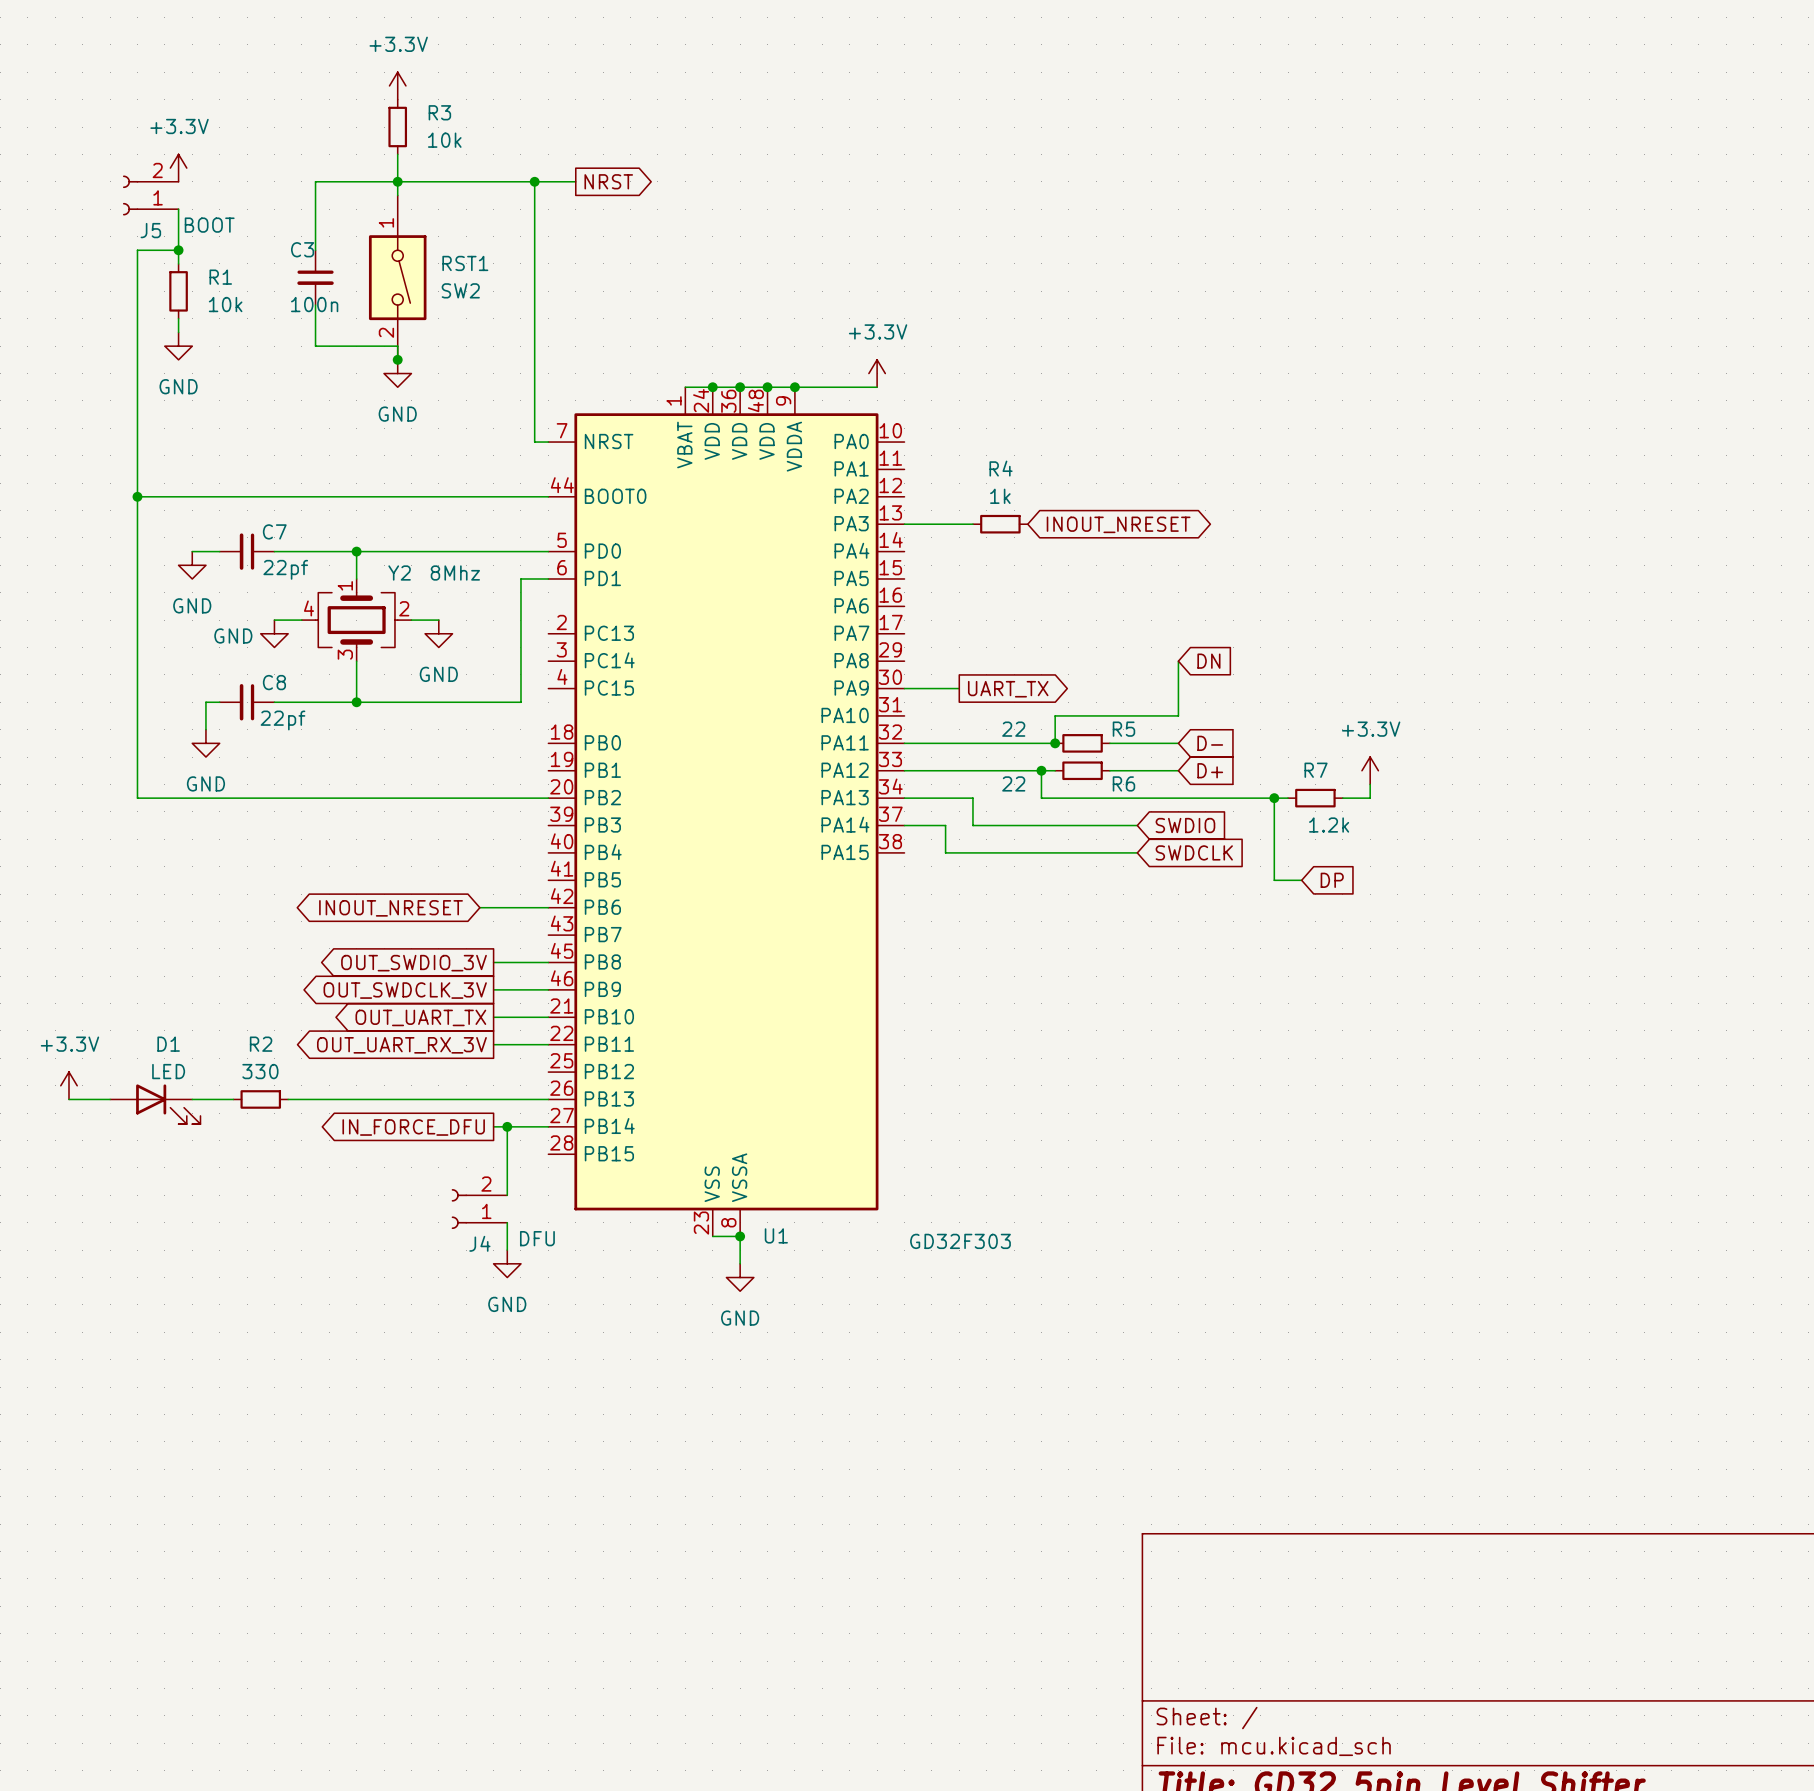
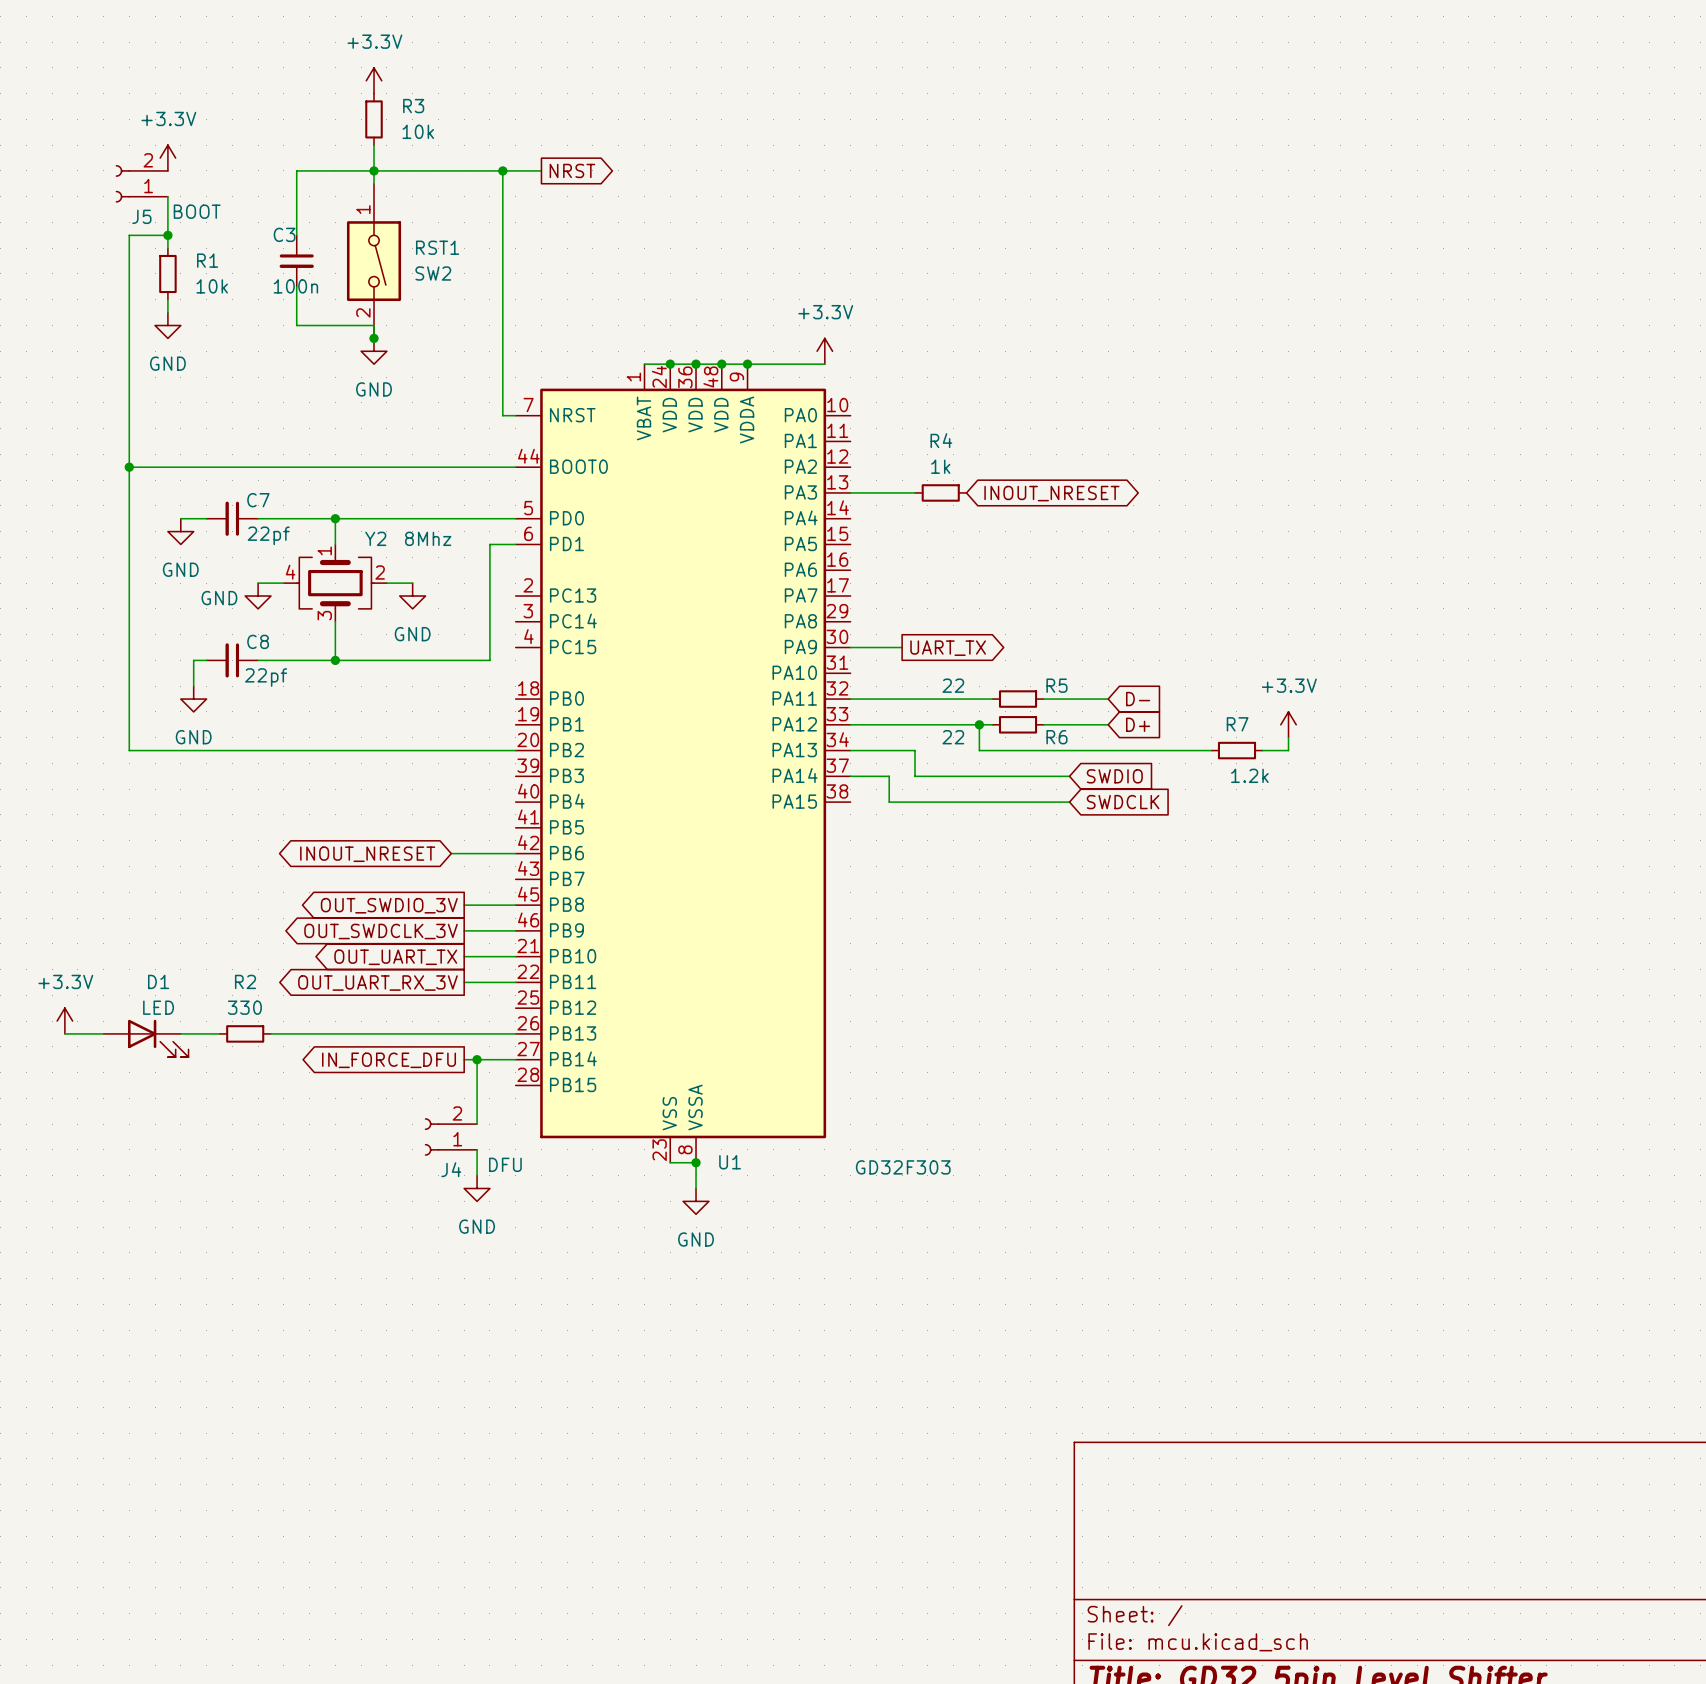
wire: (1178, 661) (1178, 715) (1055, 715) (1055, 743) -> none
global label: DN (1208, 661) -> none
junction: (1055, 743) -> none
wire: (1274, 798) (1274, 880) (1301, 880) -> none
junction: (1274, 798) -> none
global label: DP (1332, 880) -> none

